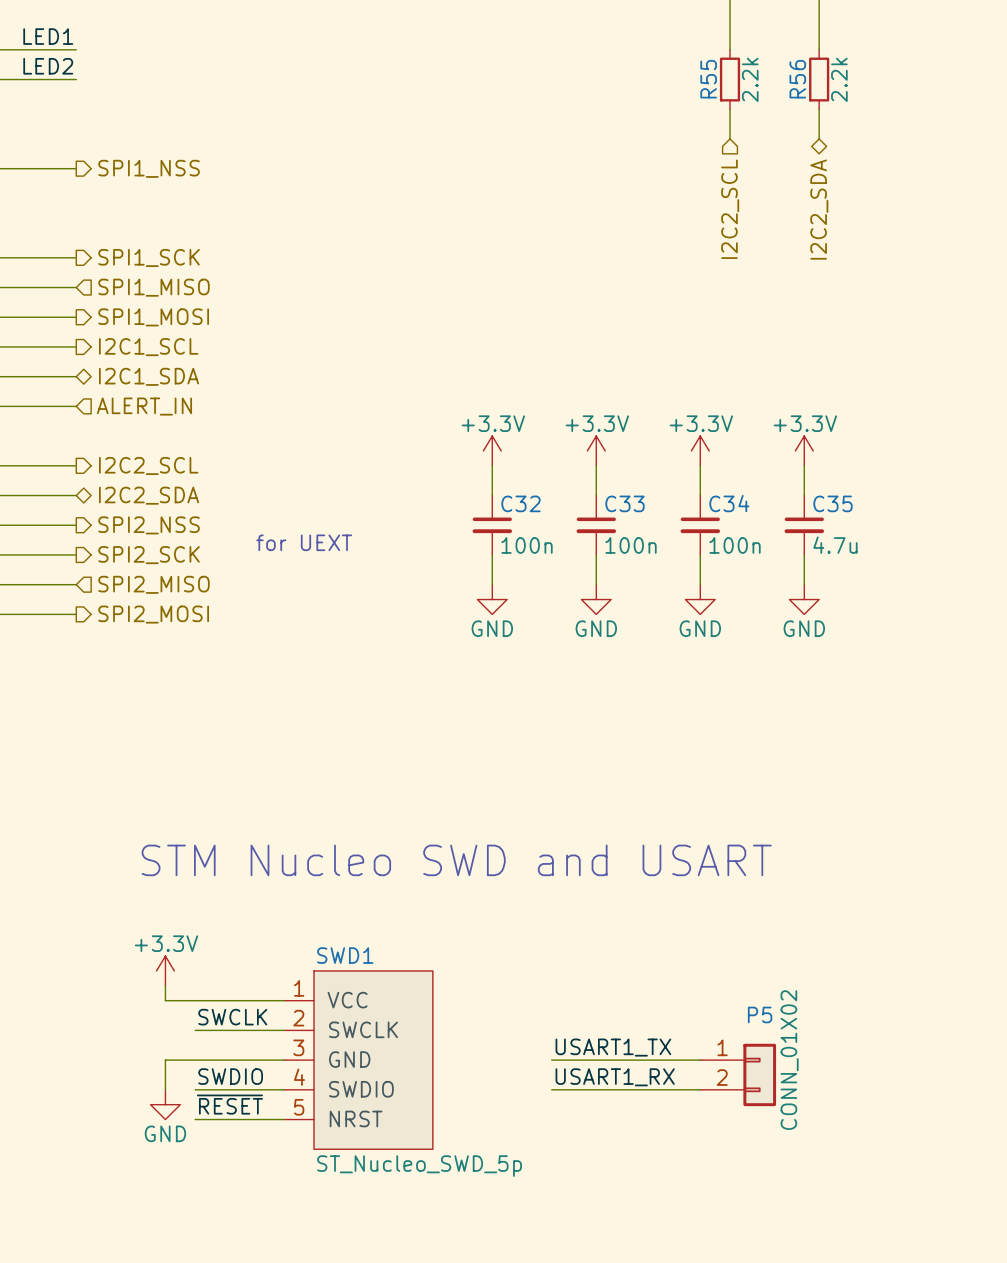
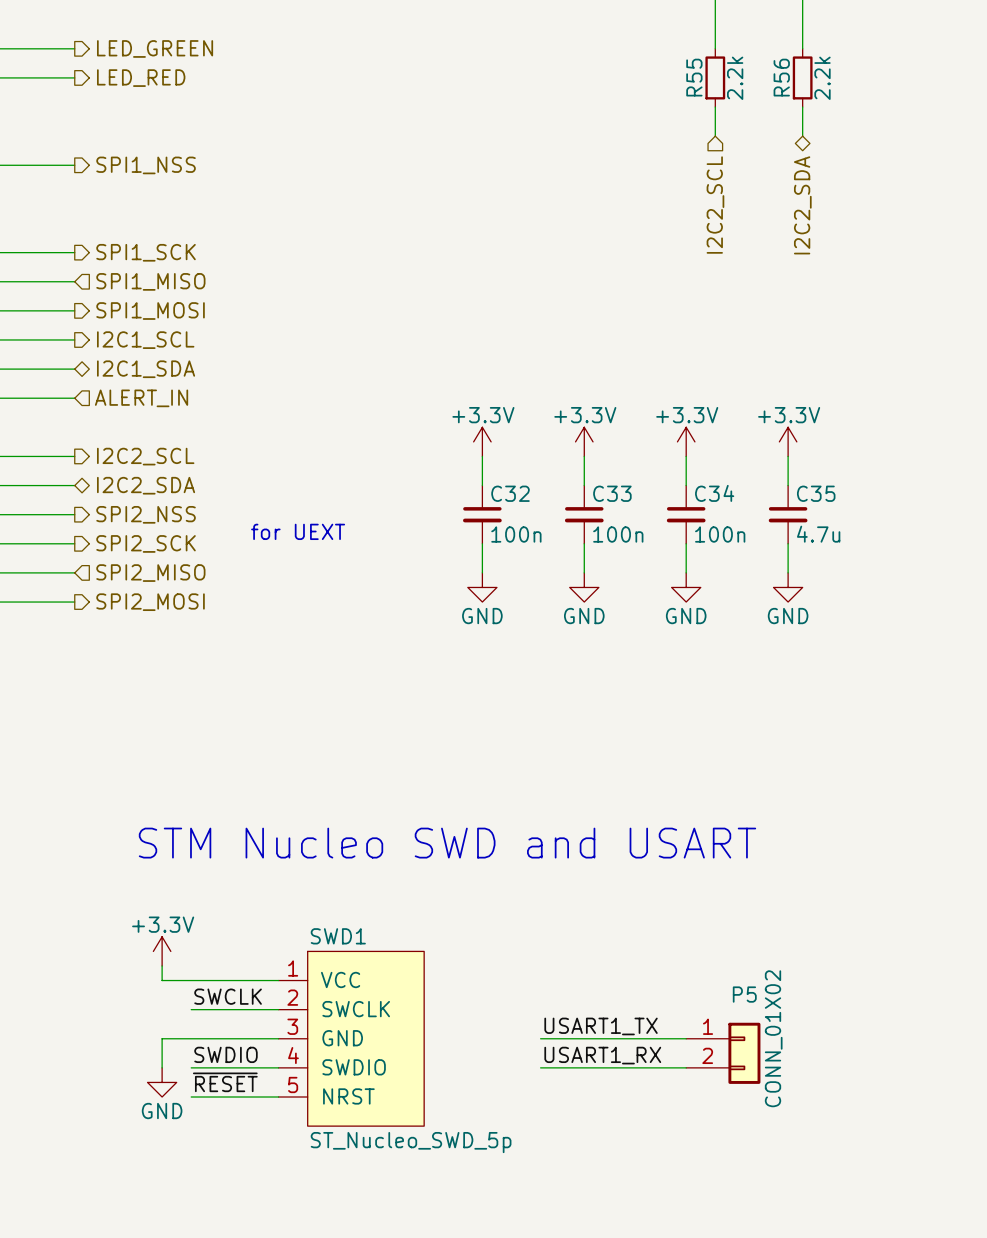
label: LED1 (48, 36) -> none
hierarchical label: none -> LED_GREEN (155, 48)
label: LED2 (48, 66) -> none
hierarchical label: none -> LED_RED (141, 78)

